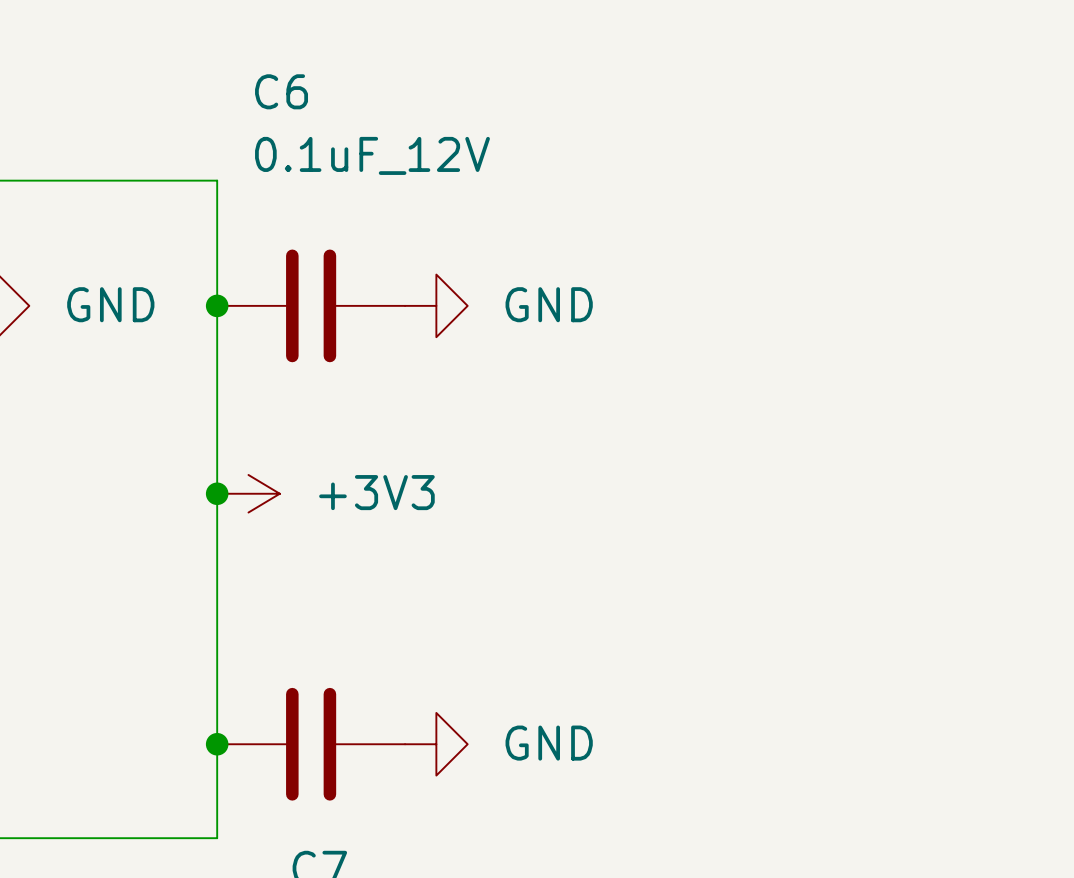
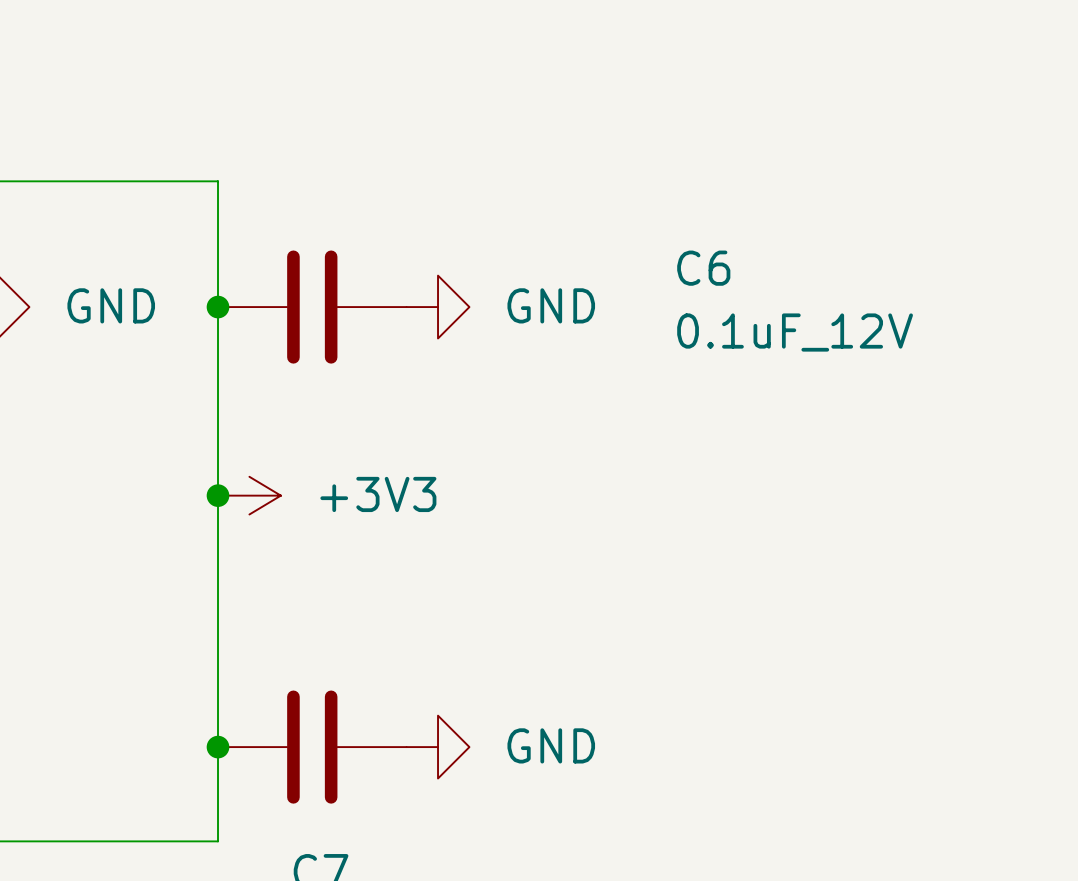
C6 name position: C6 (281, 91) -> C6 (703, 268)
C6 value position: 0.1uF_12V (372, 155) -> 0.1uF_12V (795, 332)

